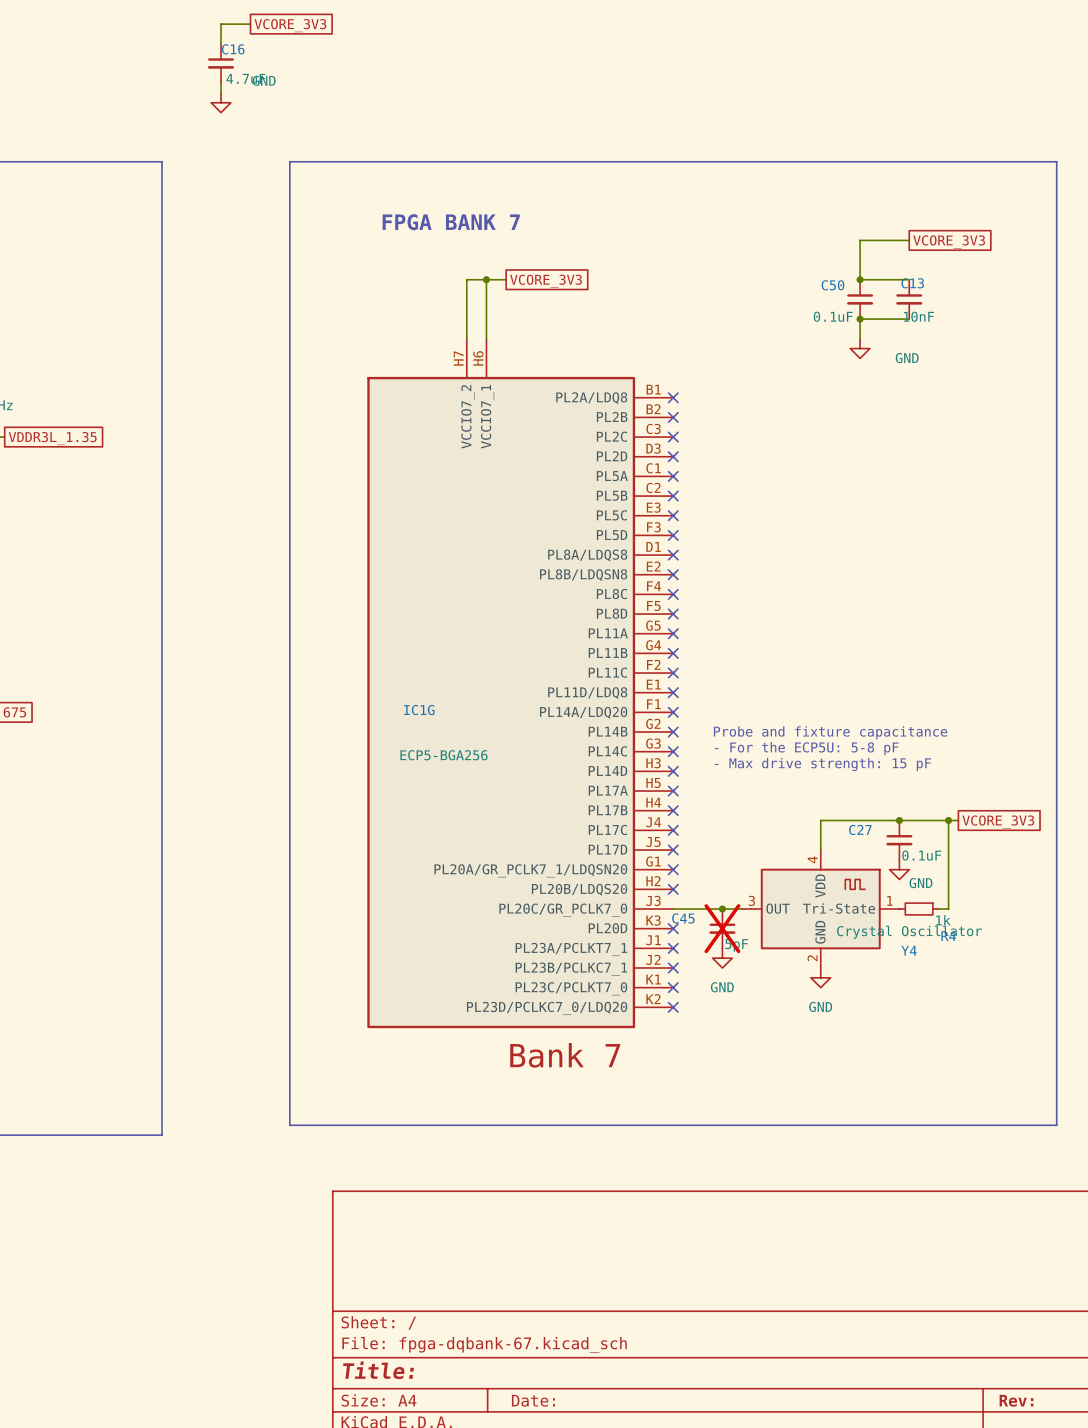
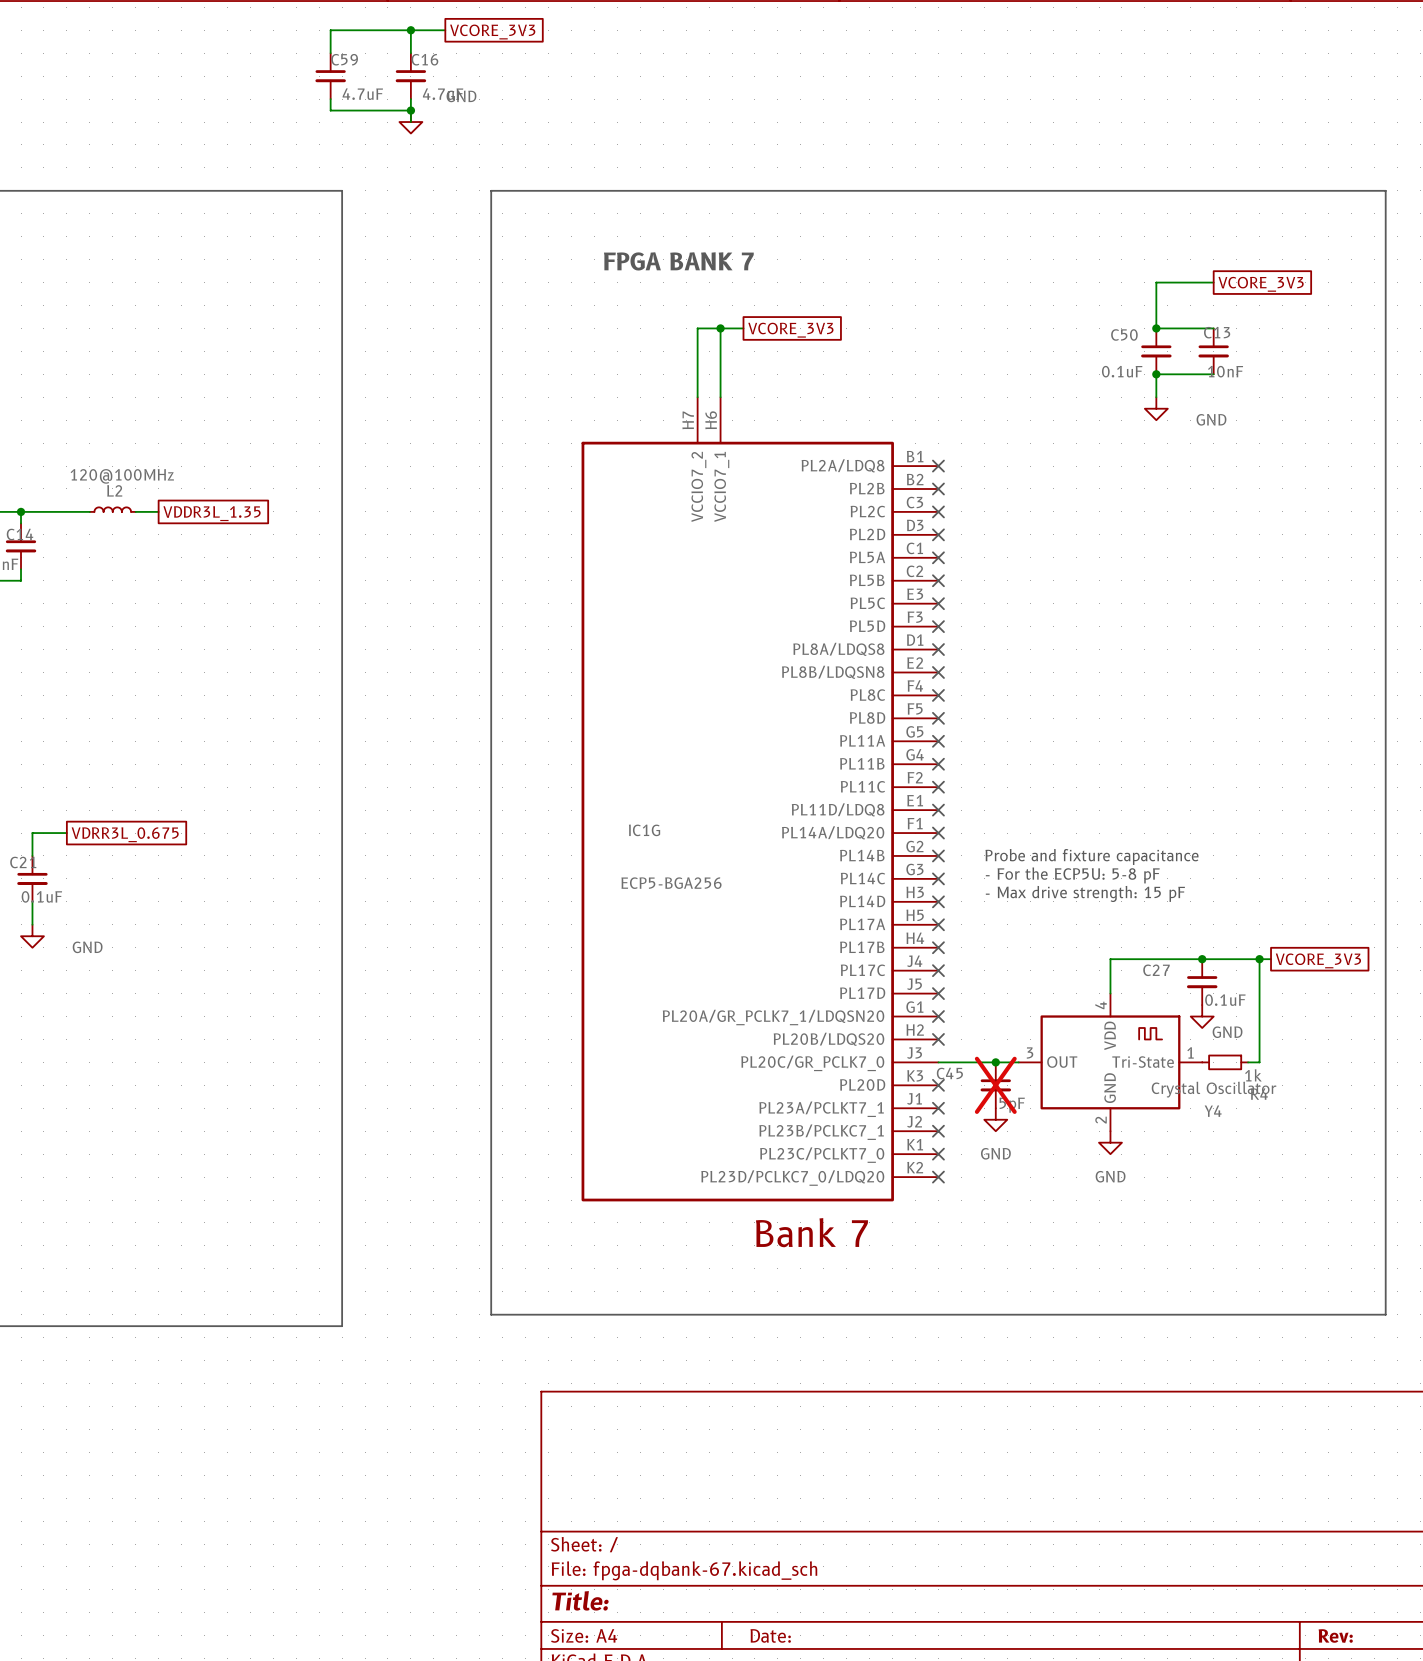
wire: none -> (410, 30) (330, 30) (330, 53)
junction: none -> (410, 30)
C59: none -> 4.7uF (330, 76)
wire: none -> (330, 99) (330, 110) (410, 110) (410, 122)
junction: none -> (410, 110)

